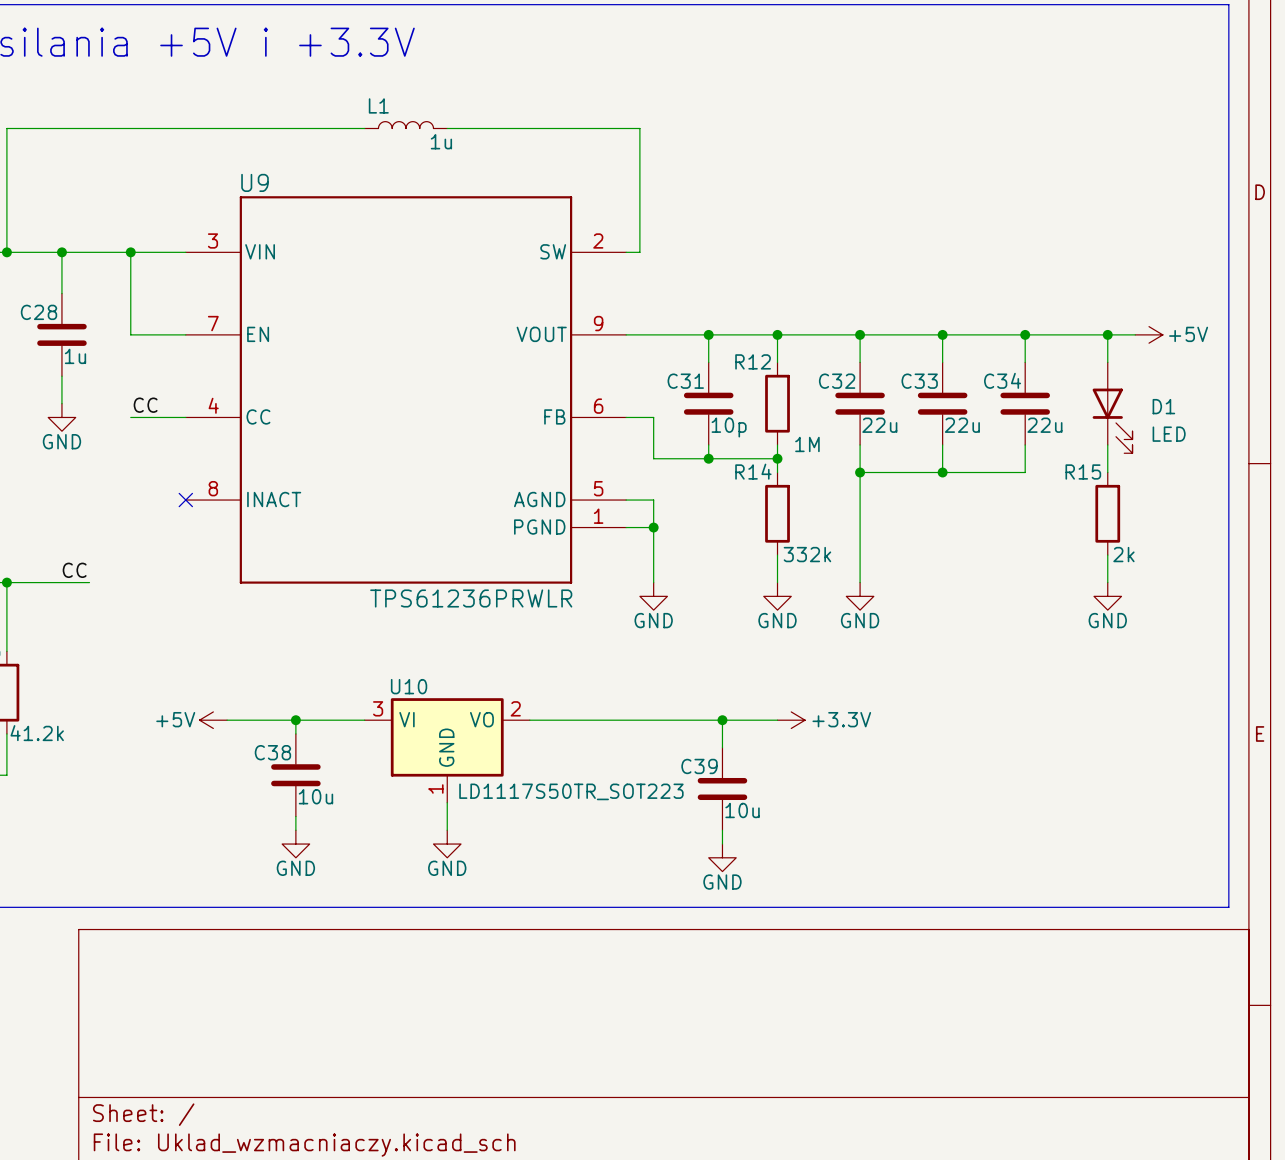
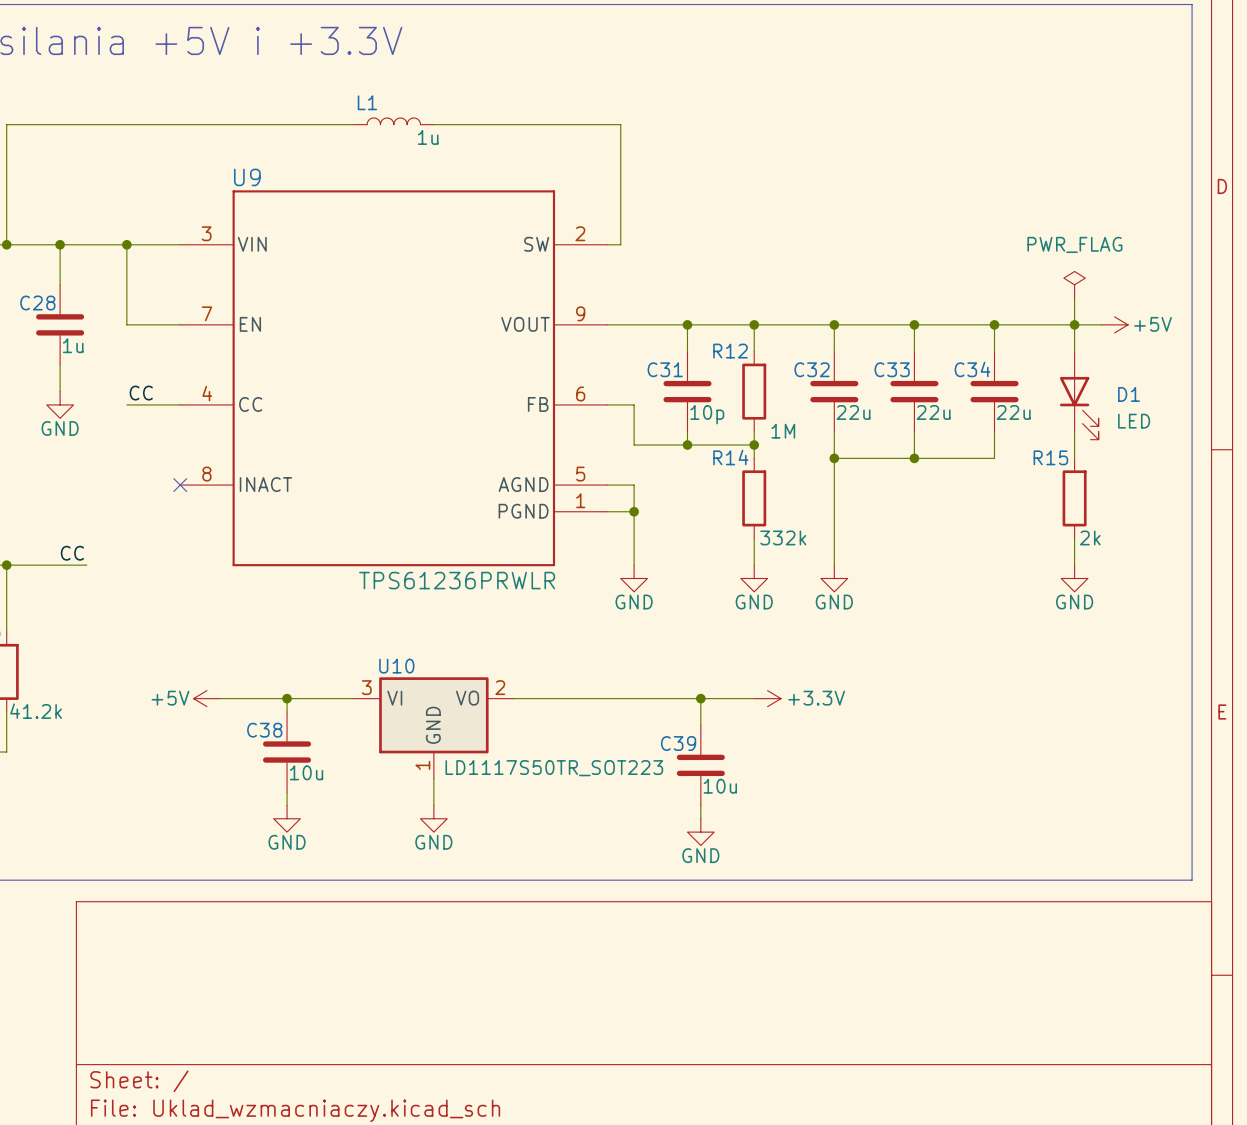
power symbol: none -> PWR_FLAG (1074, 284)
wire: none -> (1074, 298) (1074, 324)

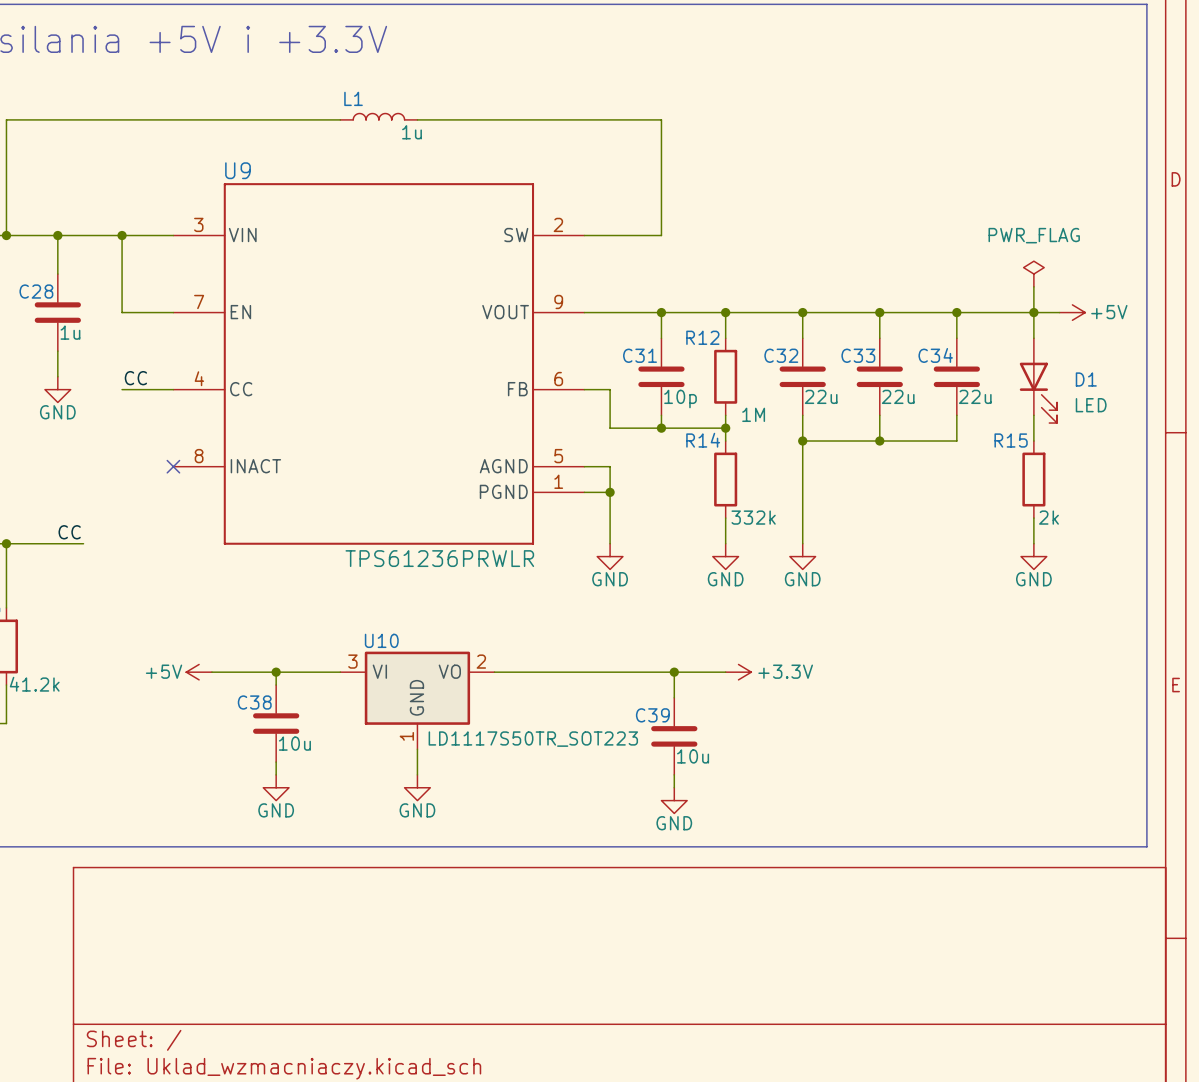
wire: (620, 124) (620, 244) -> (597, 119) (661, 119) (661, 235) (597, 235)

